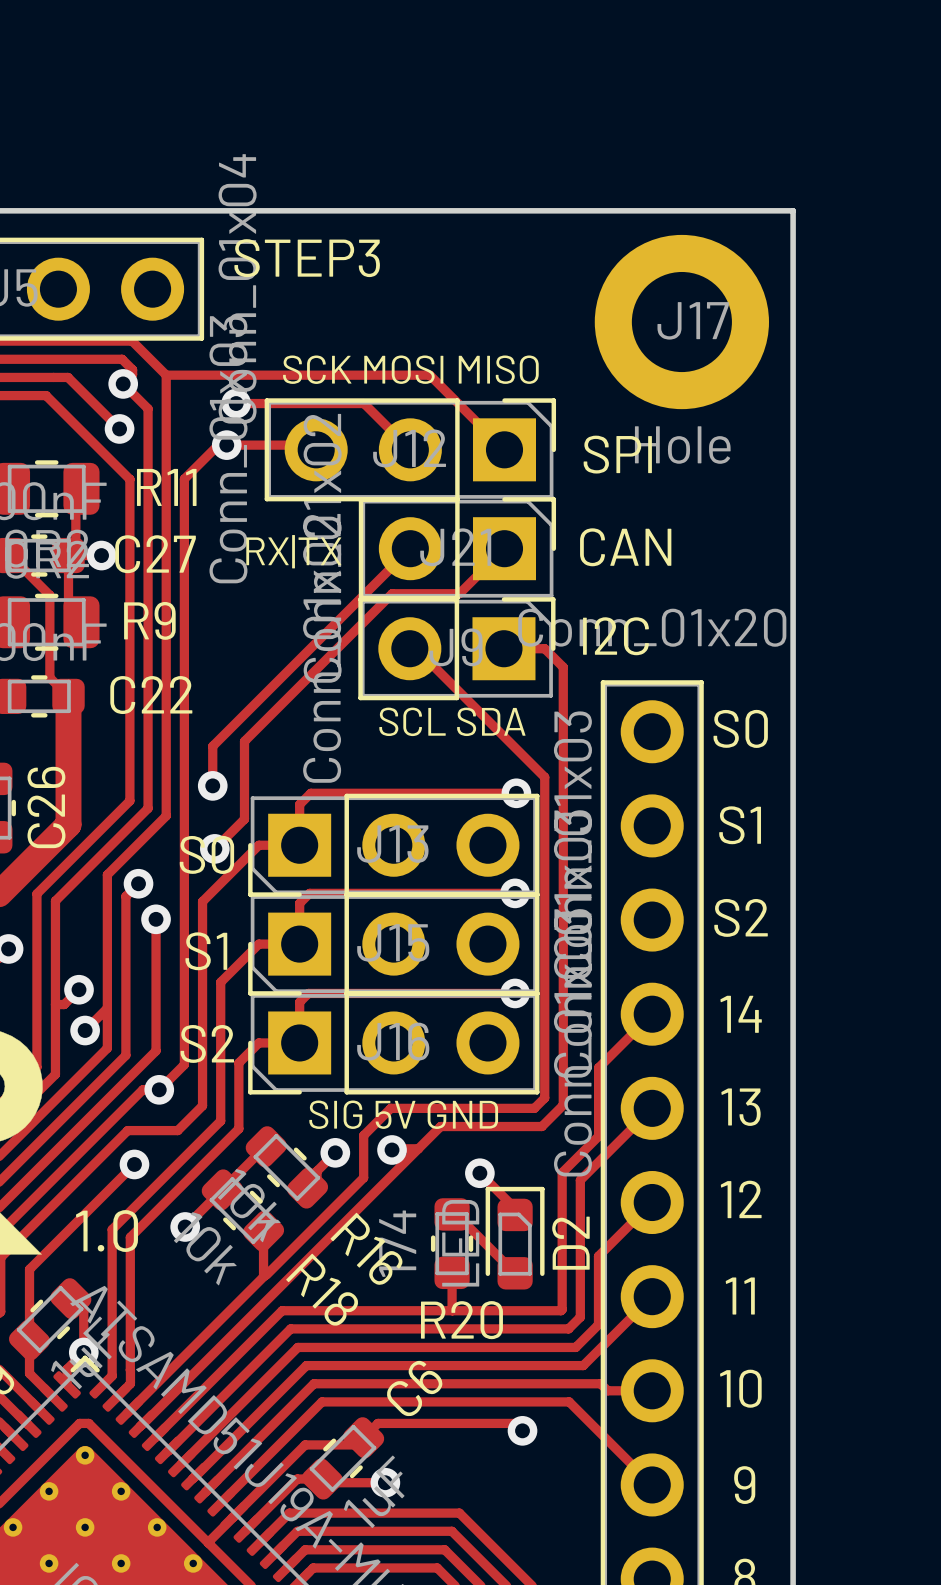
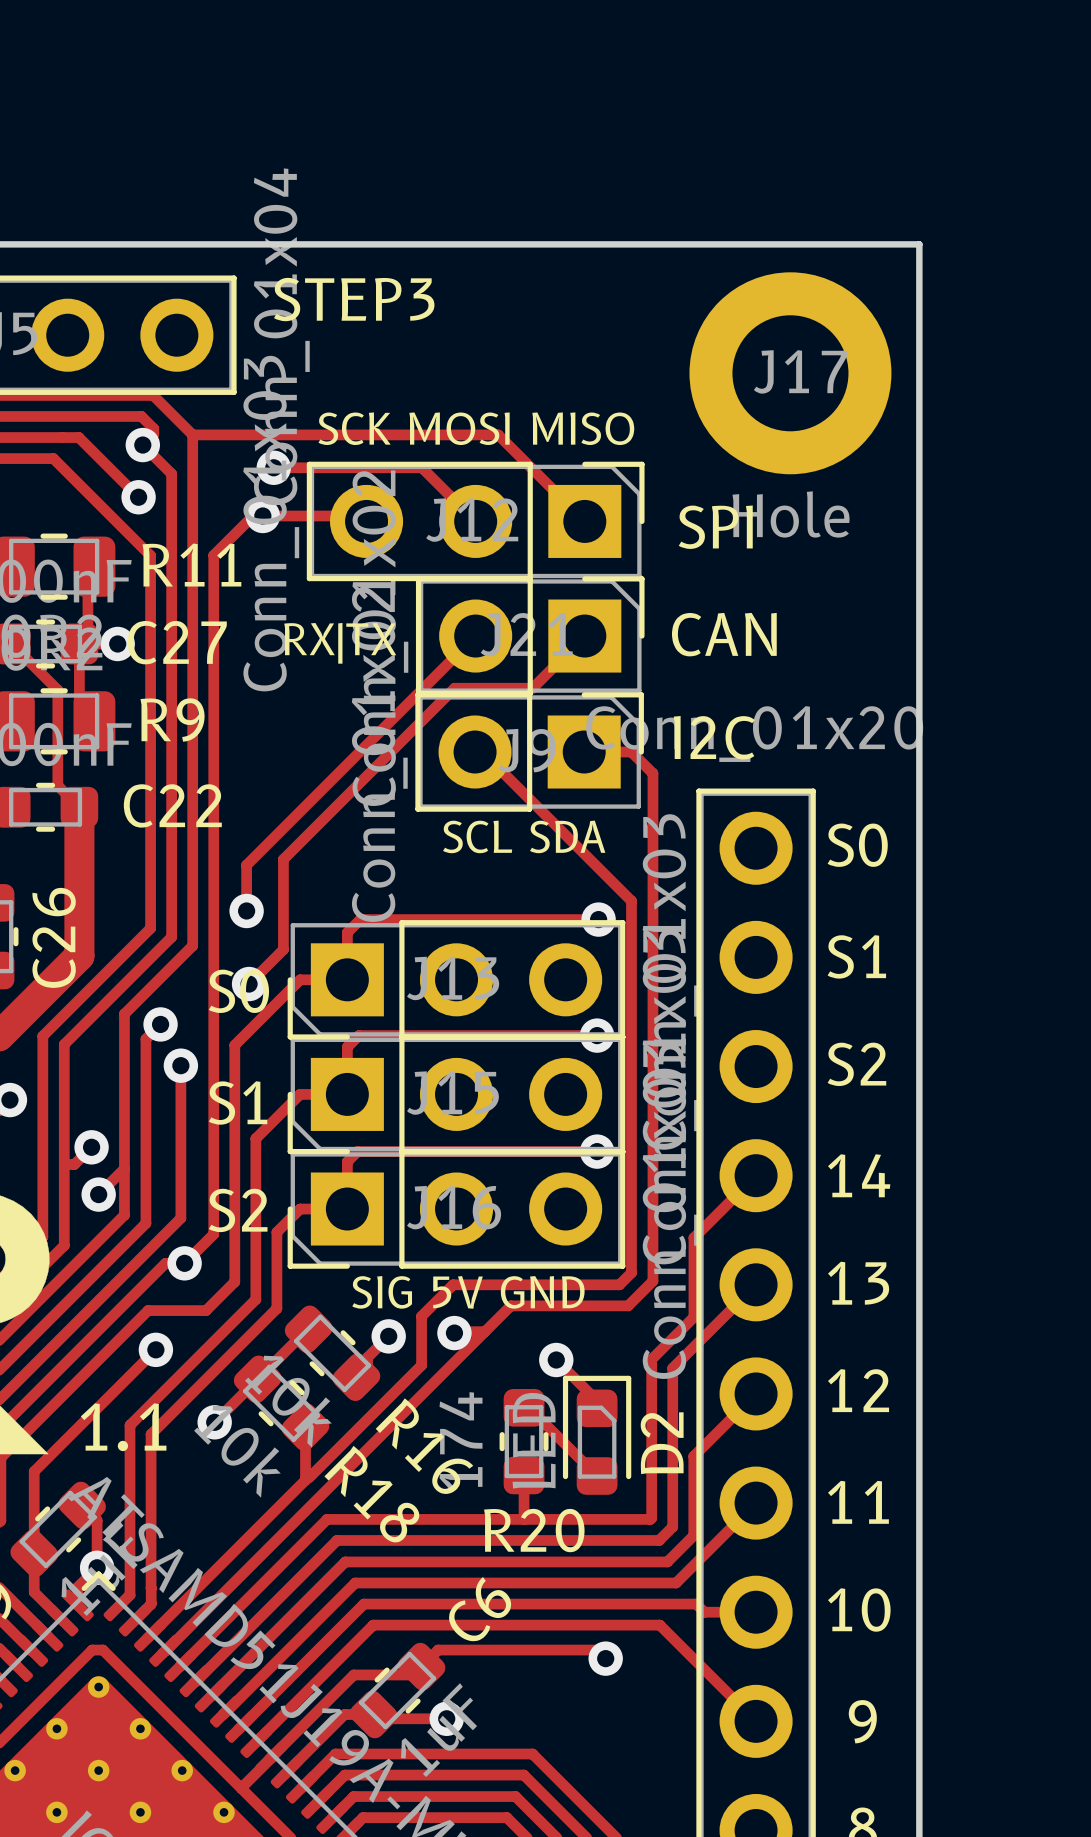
text: 1.0 (106, 1231) -> 1.1 (123, 1427)

